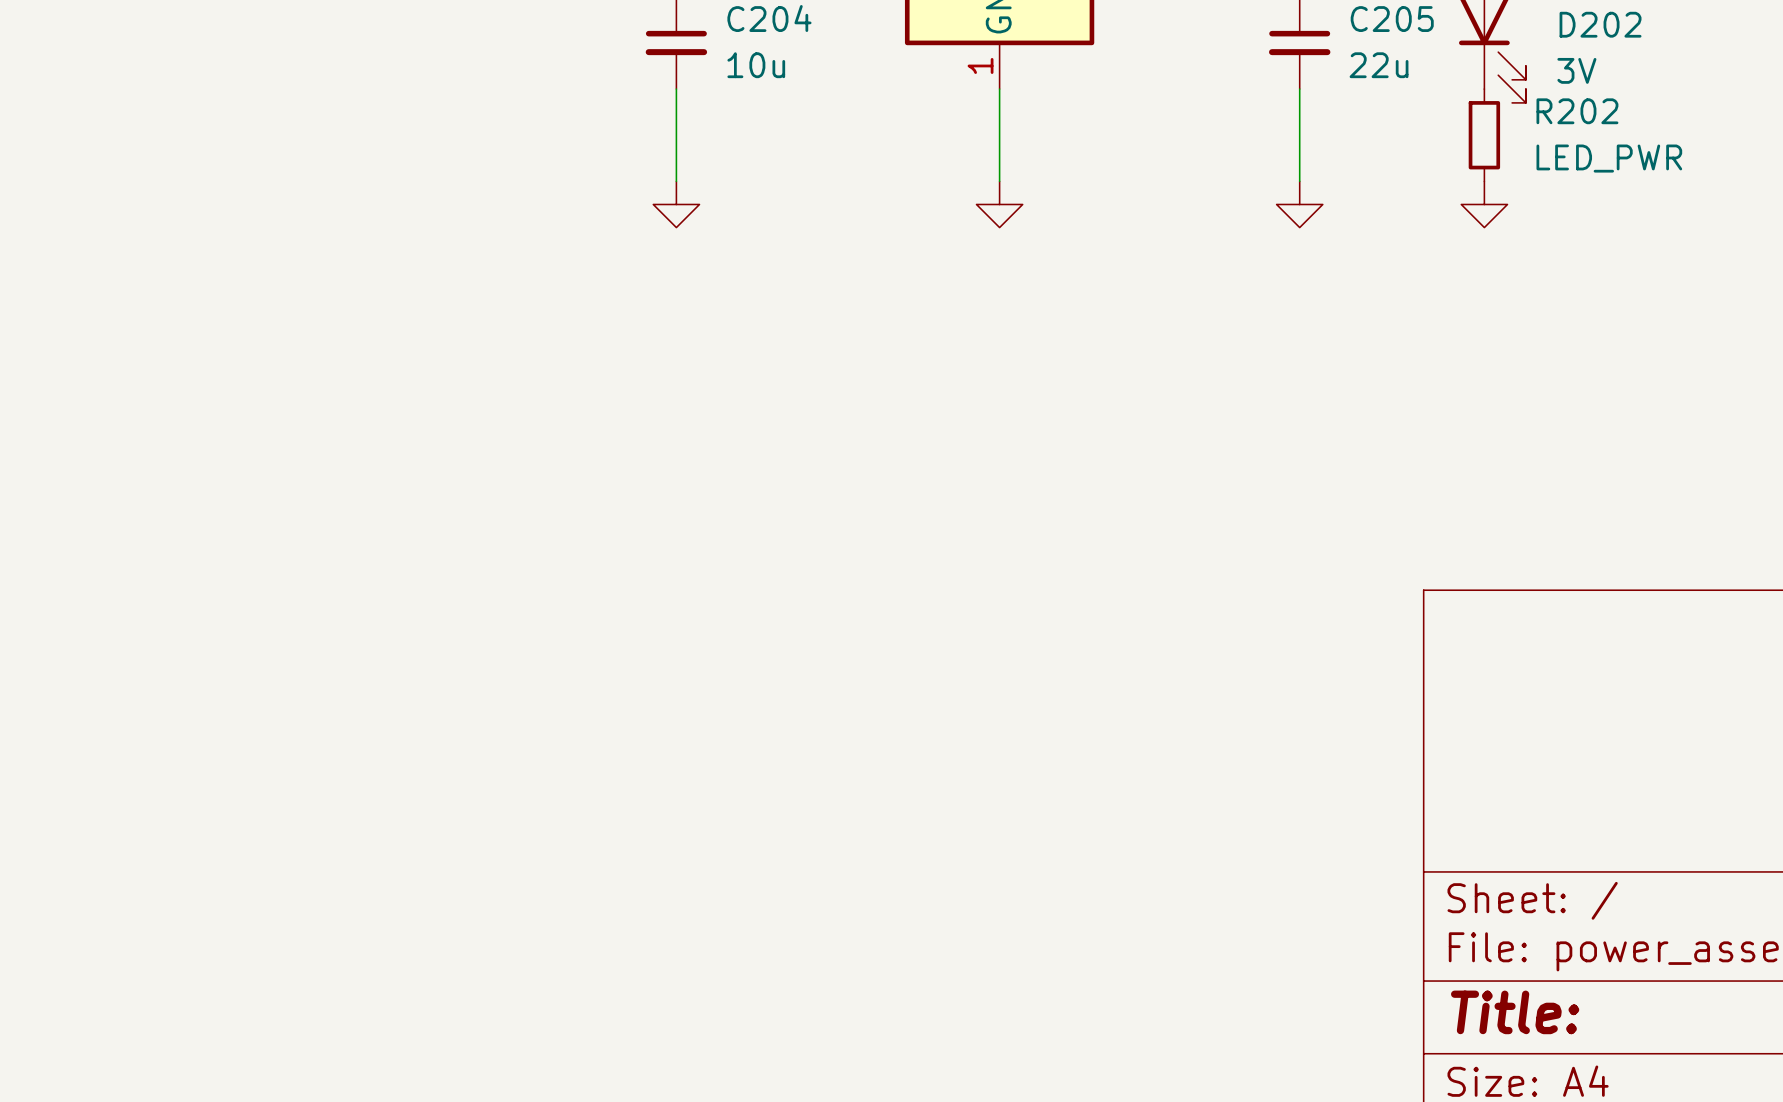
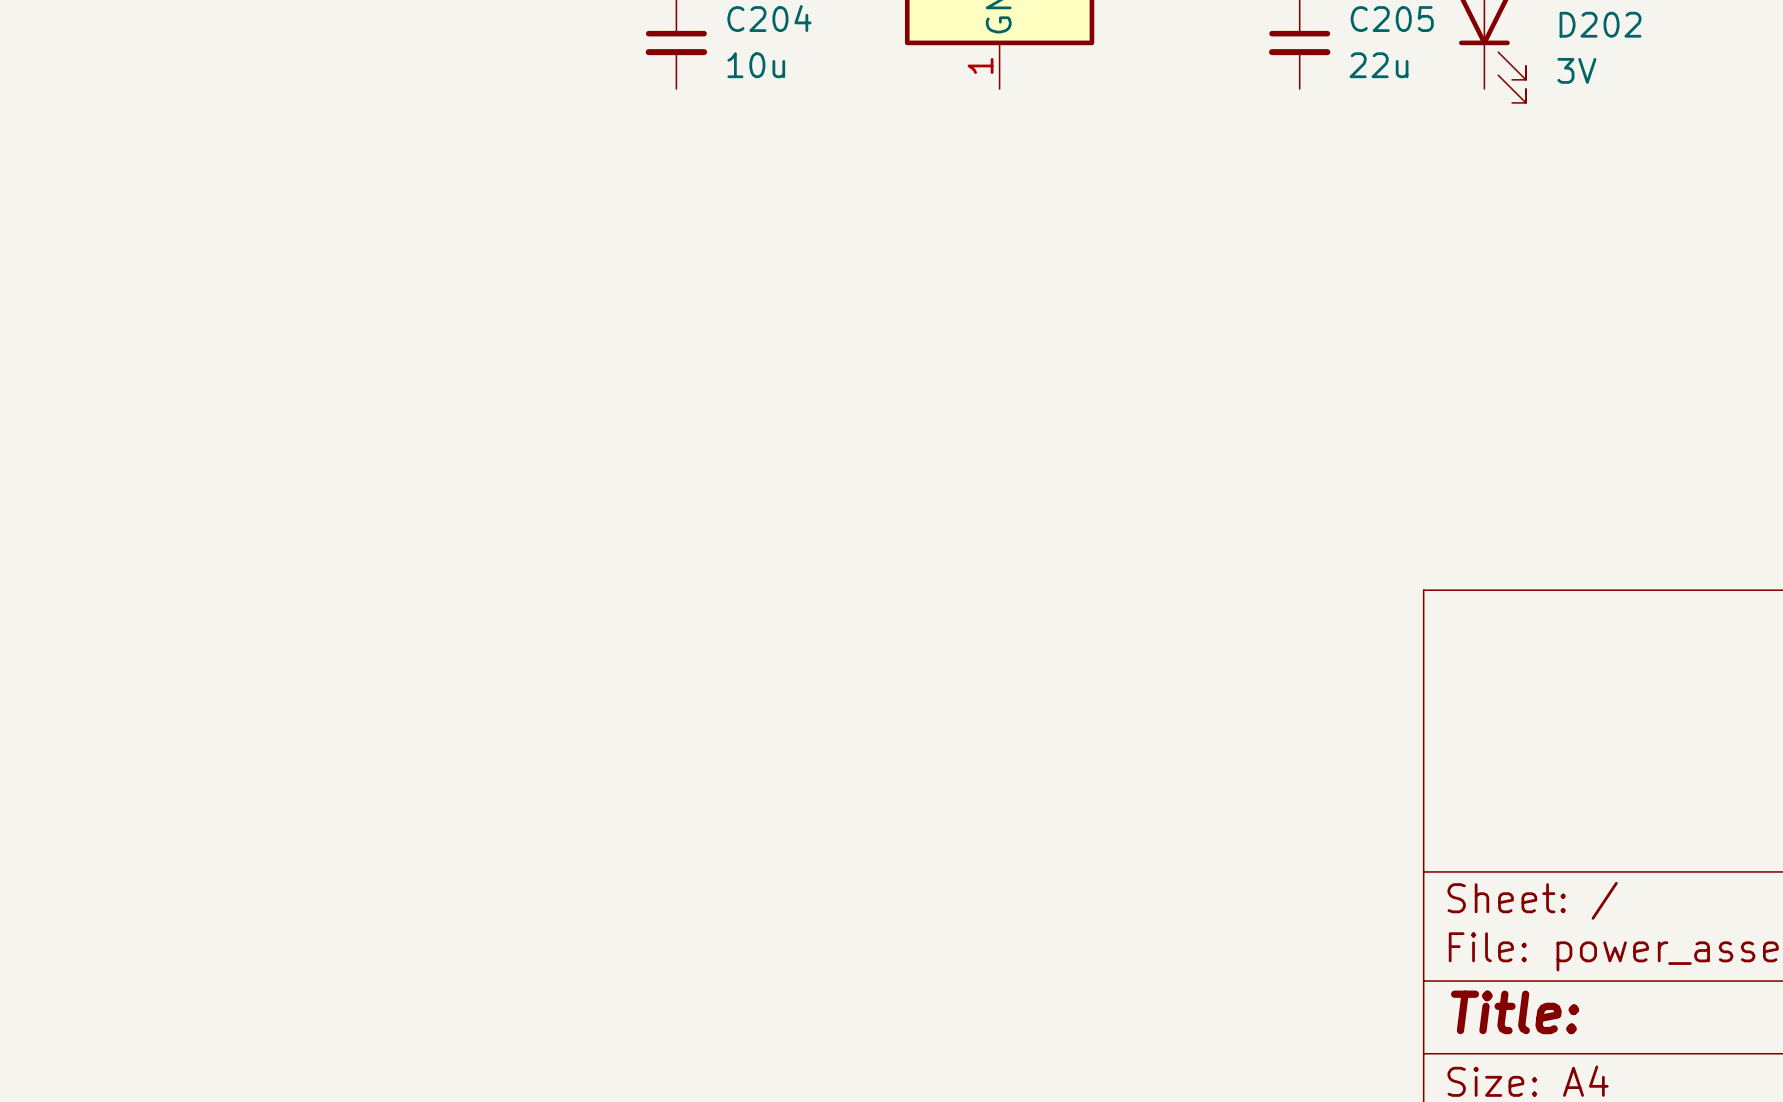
wire: (676, 89) (676, 181) -> none
wire: (999, 89) (999, 181) -> none
wire: (1299, 89) (1299, 181) -> none
R202: LED_PWR (1484, 135) -> none
power symbol: (676, 204) -> none
power symbol: (999, 204) -> none
power symbol: (1299, 204) -> none
power symbol: (1484, 204) -> none

